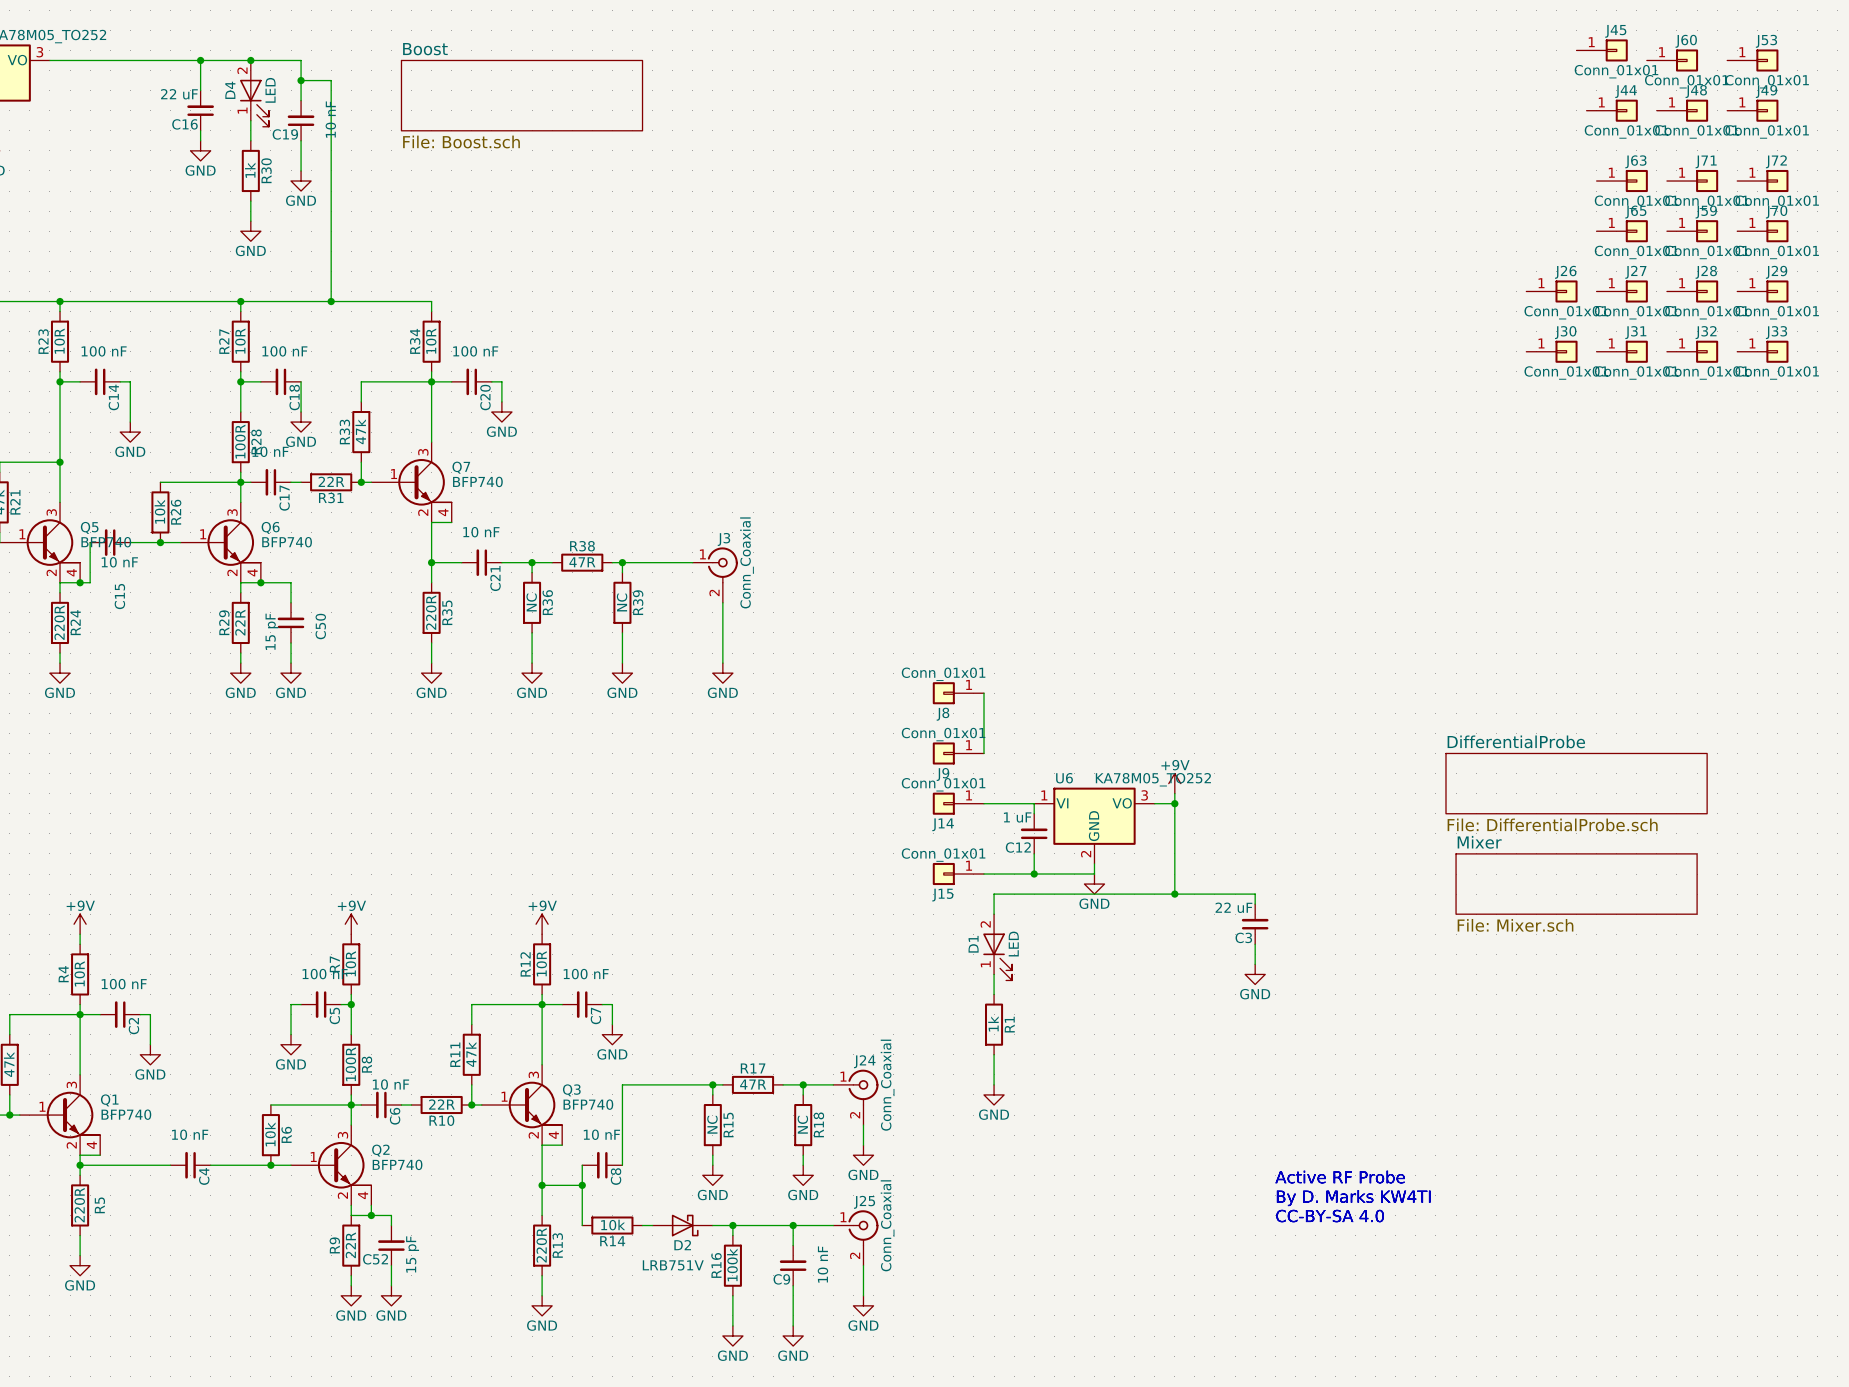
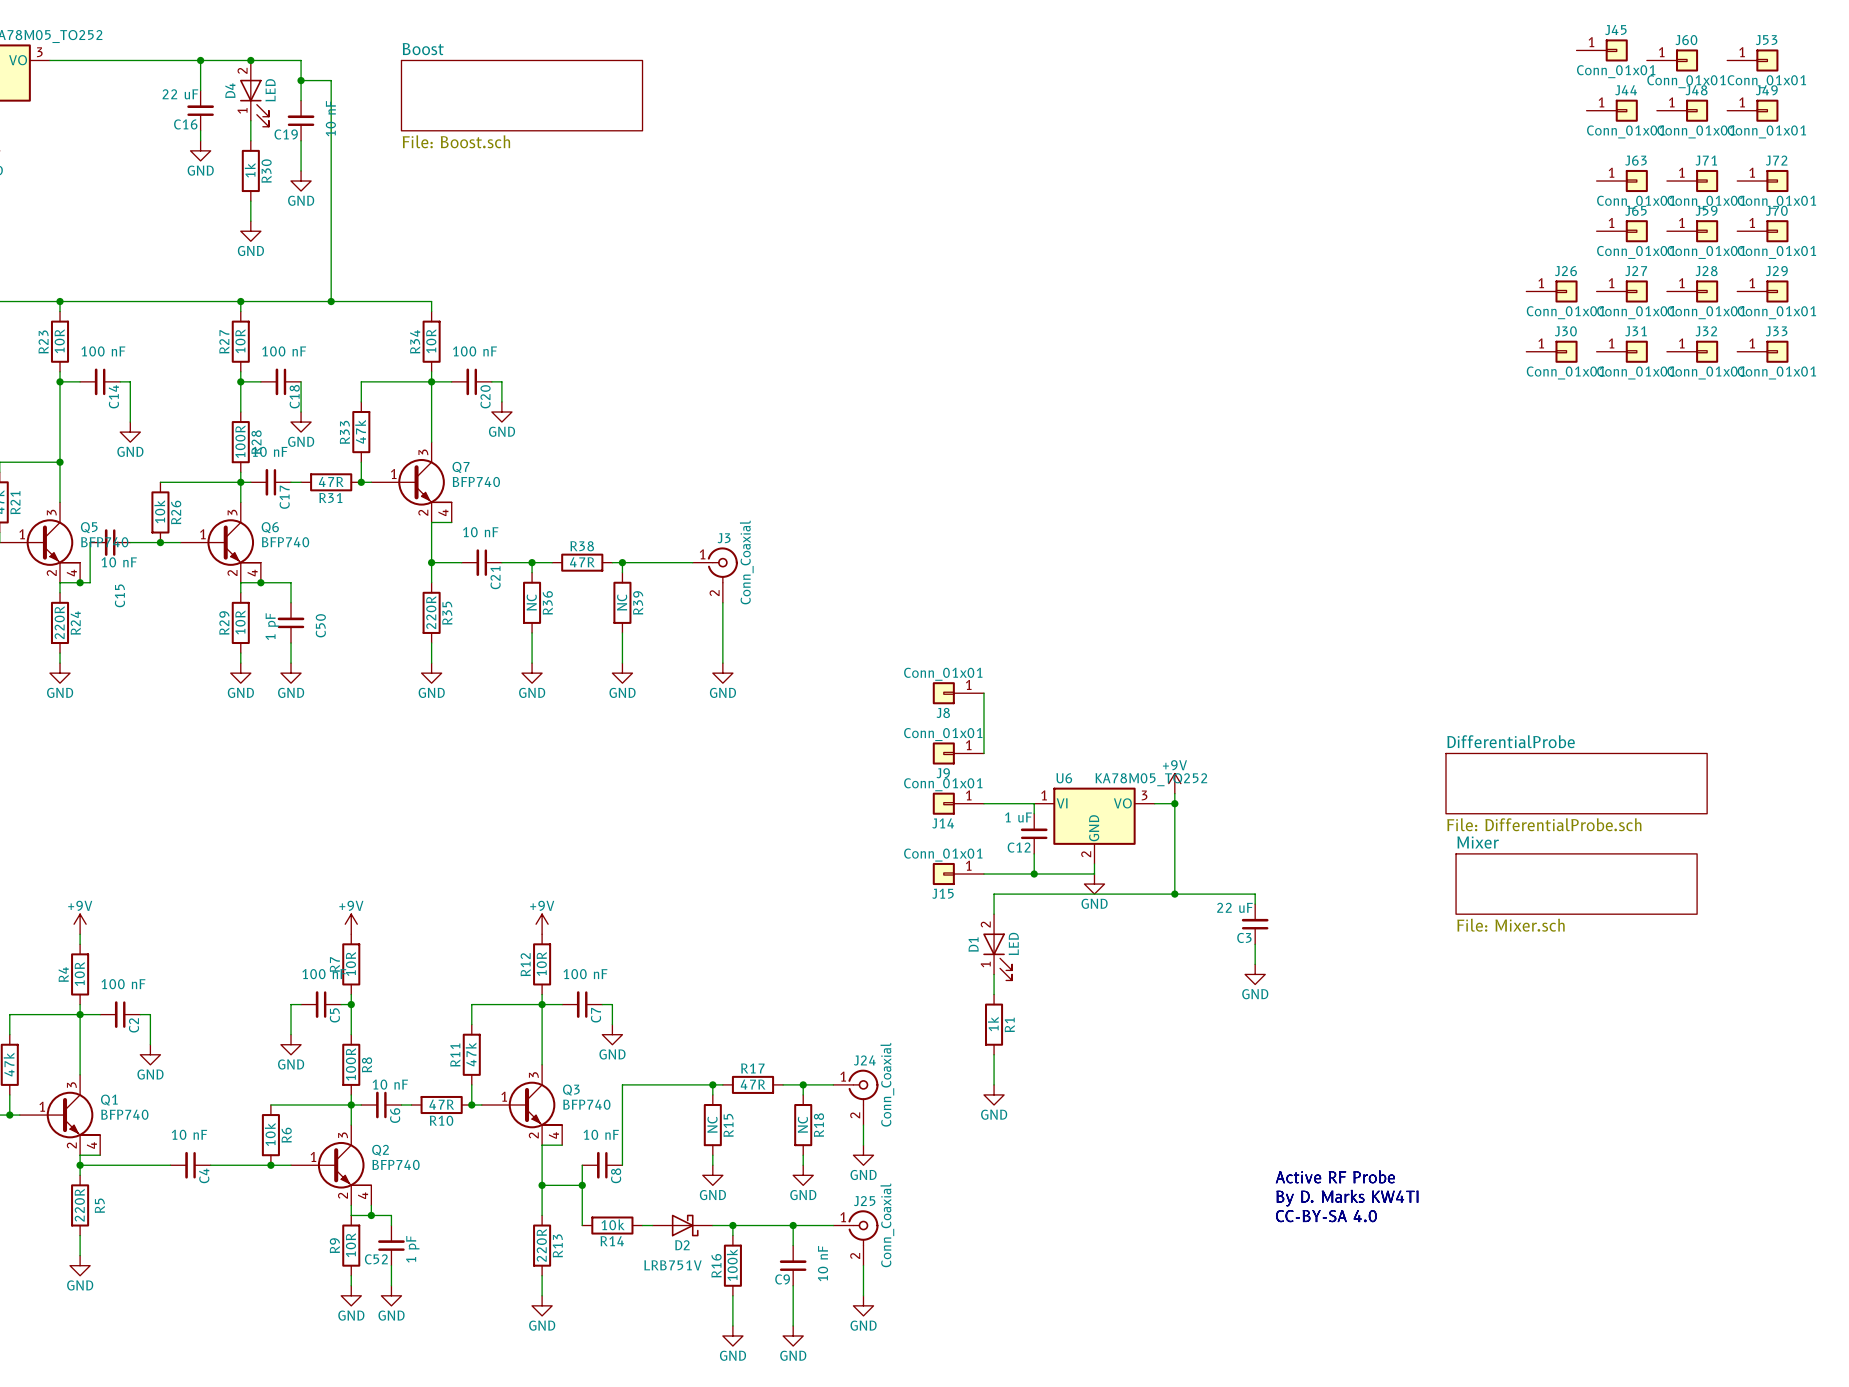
R31 value: 22R (331, 481) -> 47R (331, 481)
R29 value: 22R (240, 622) -> 10R (240, 622)
C50 value: 15 pF (271, 631) -> 1 pF (272, 626)
R10 value: 22R (441, 1104) -> 47R (441, 1104)
R9 value: 22R (350, 1245) -> 10R (350, 1245)
C52 value: 15 pF (412, 1254) -> 1 pF (412, 1249)

